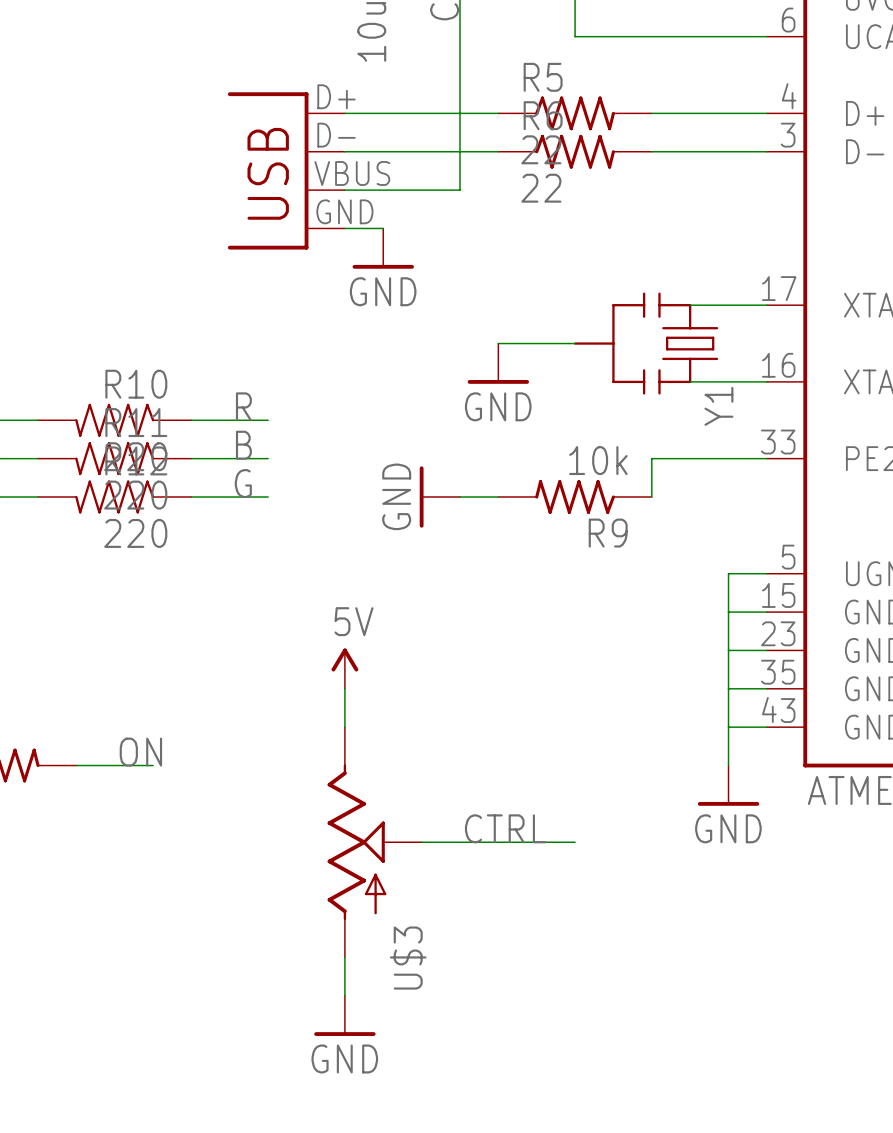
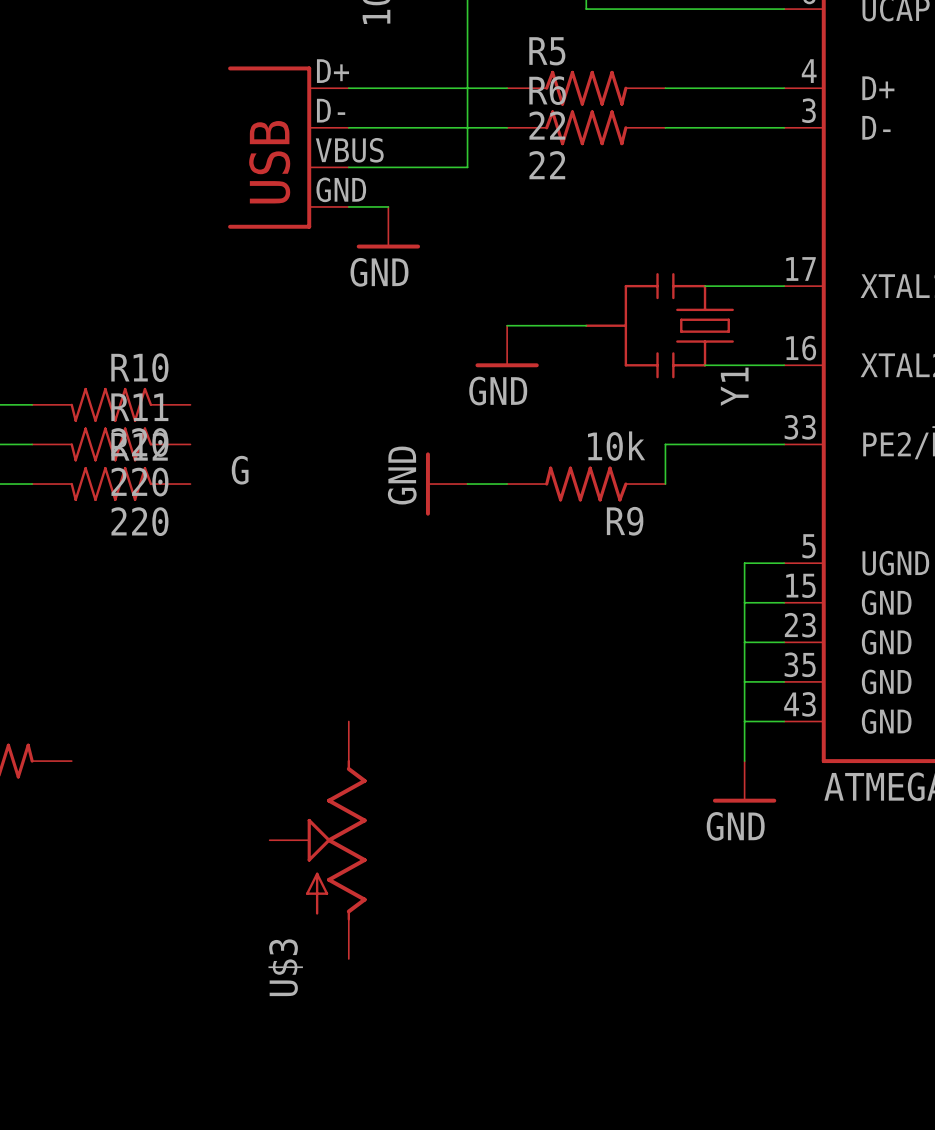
label: R (243, 406) -> none
wire: (191, 420) (268, 420) -> none
label: B (243, 445) -> none
wire: (191, 458) (268, 458) -> none
wire: (191, 496) (268, 496) -> none
power symbol: 5V (344, 668) -> none
wire: (344, 688) (344, 727) -> none
label: ON (140, 752) -> none
wire: (76, 765) (153, 765) -> none
label: CTRL (505, 828) -> none
U$3 flip: as is (356, 842) -> left-right (336, 840)
wire: (421, 842) (575, 842) -> none
wire: (344, 957) (344, 995) -> none
power symbol: GND (344, 1015) -> none

